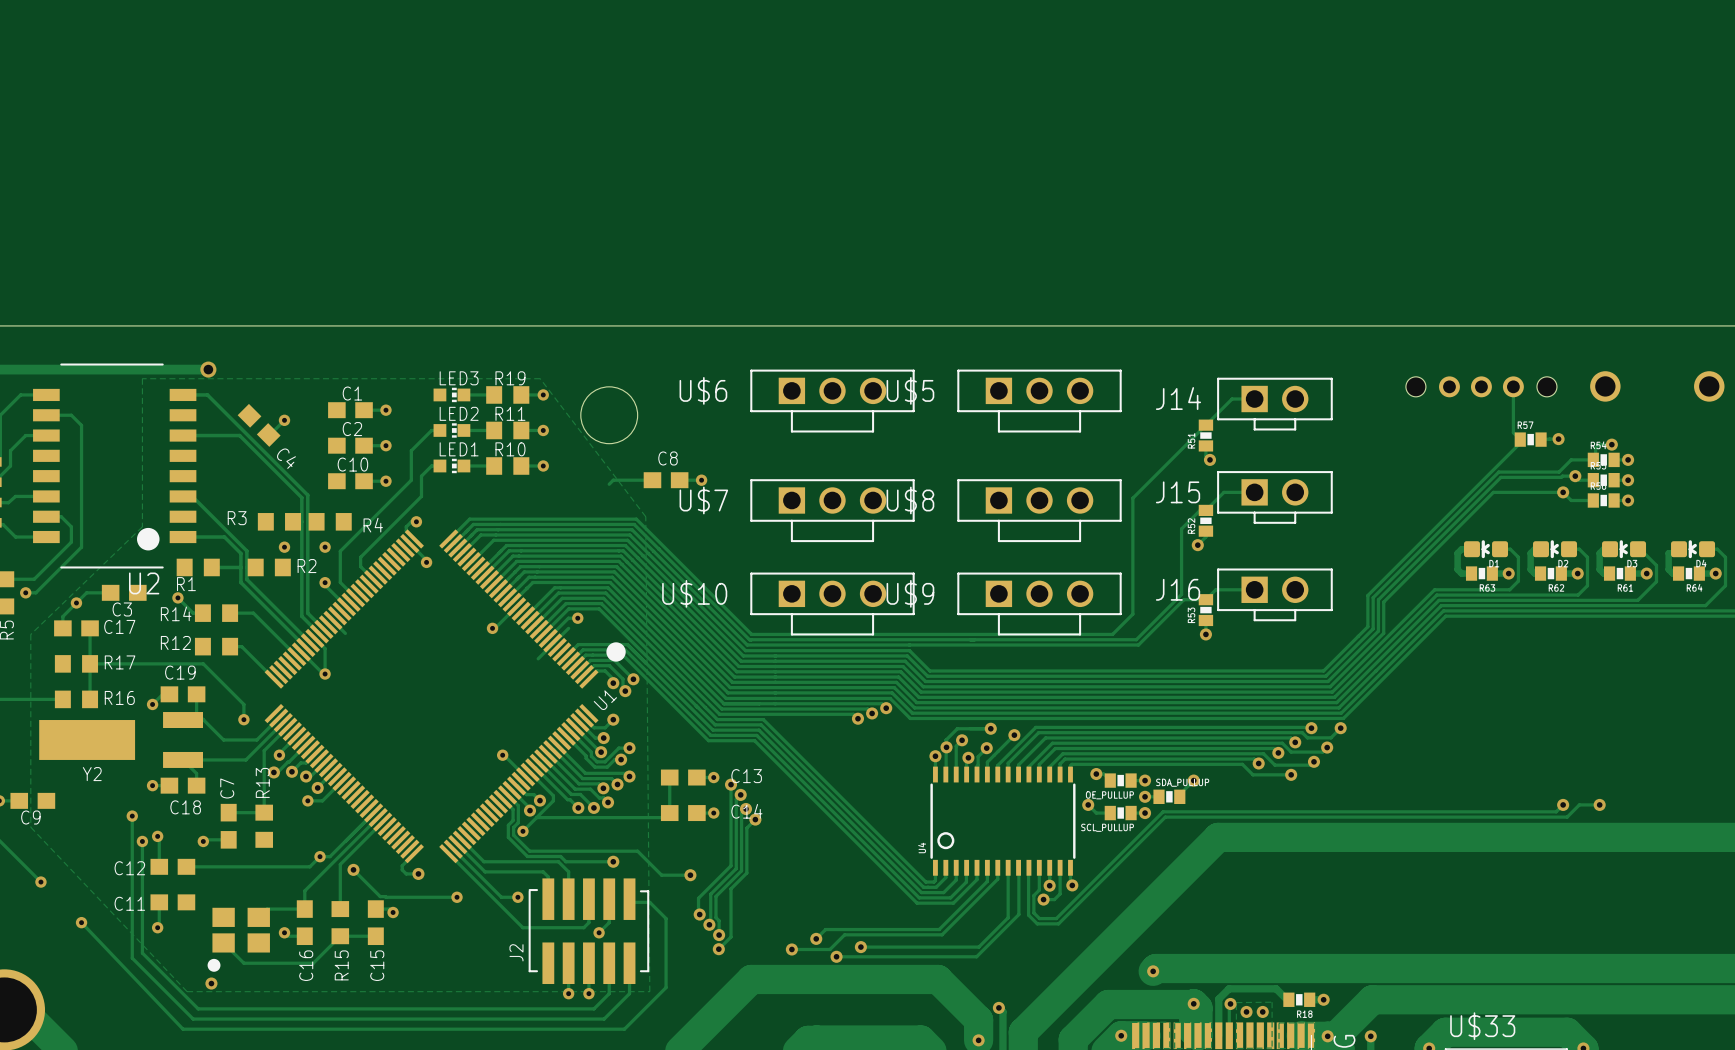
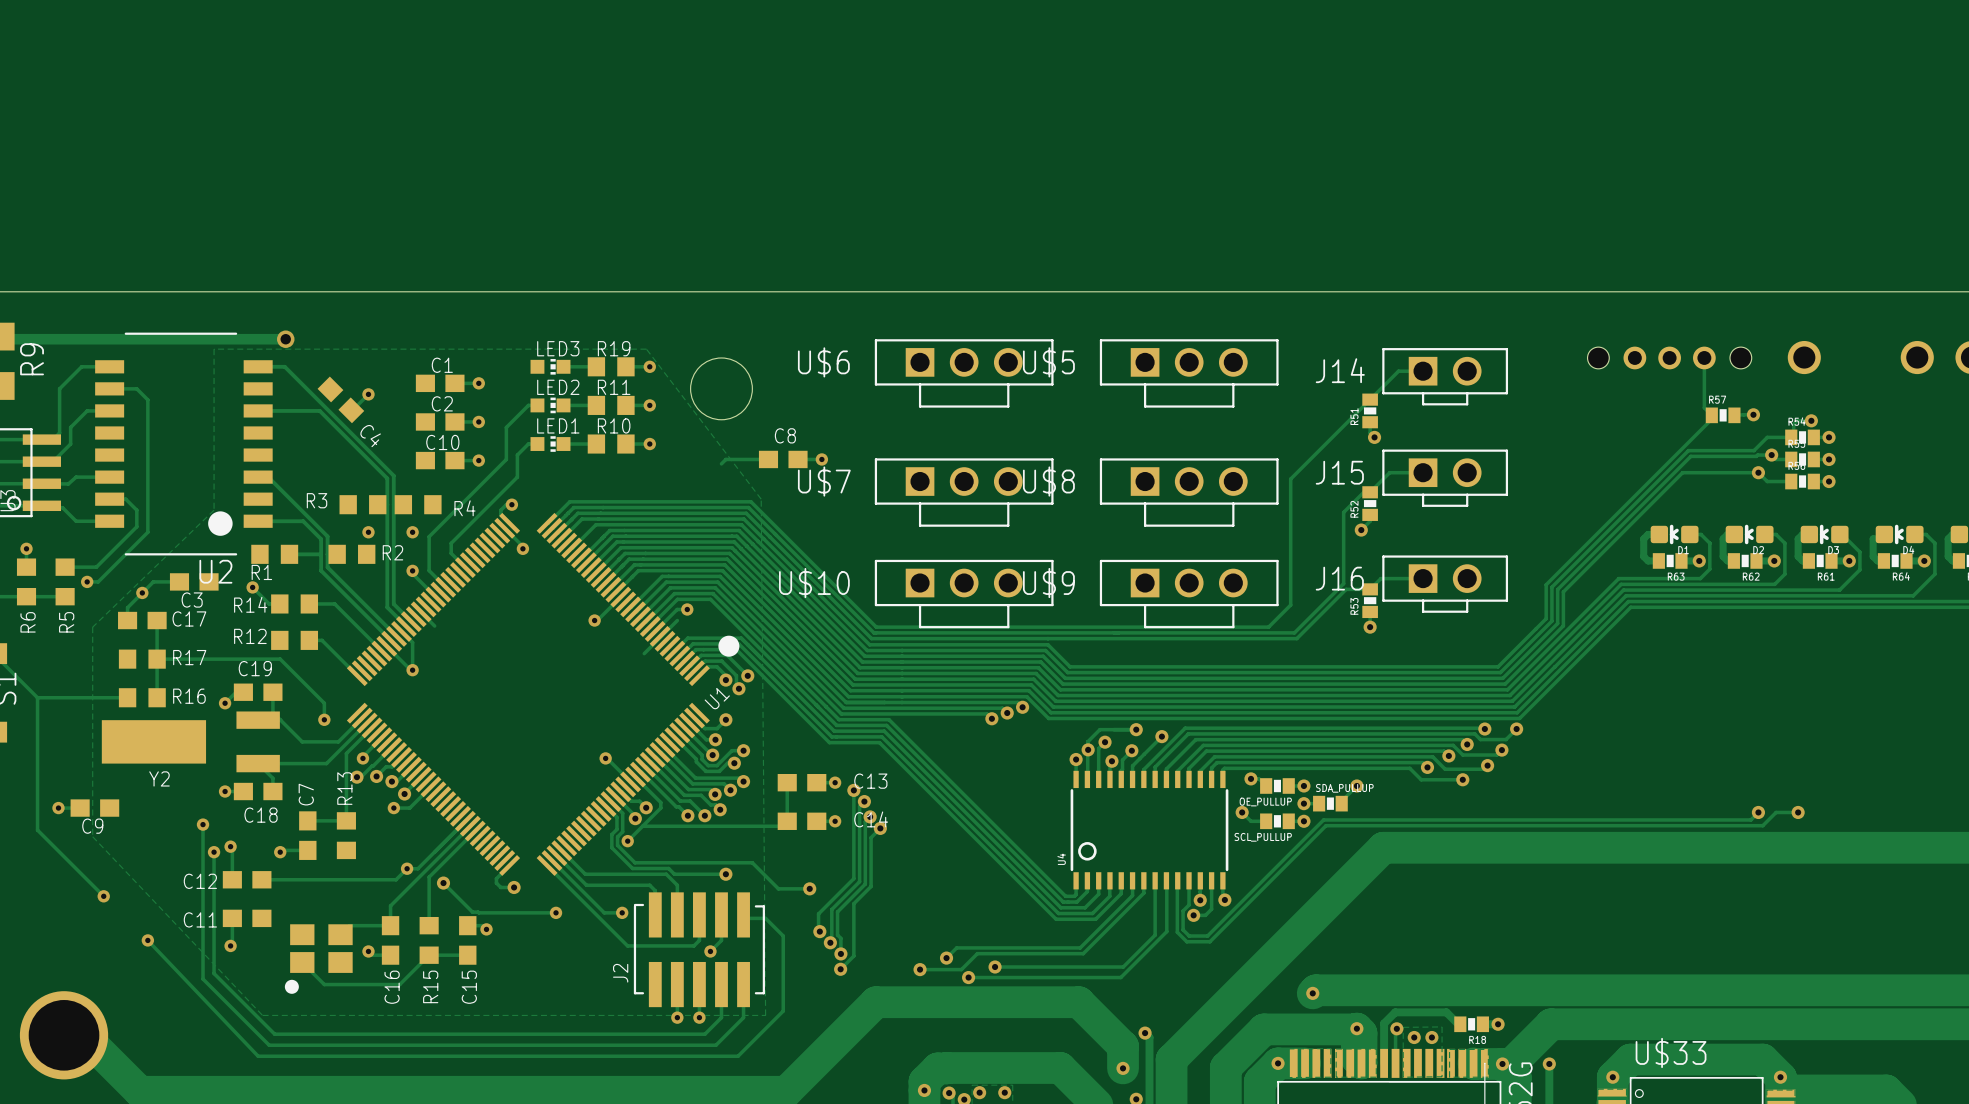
via: (211, 983) -> none

